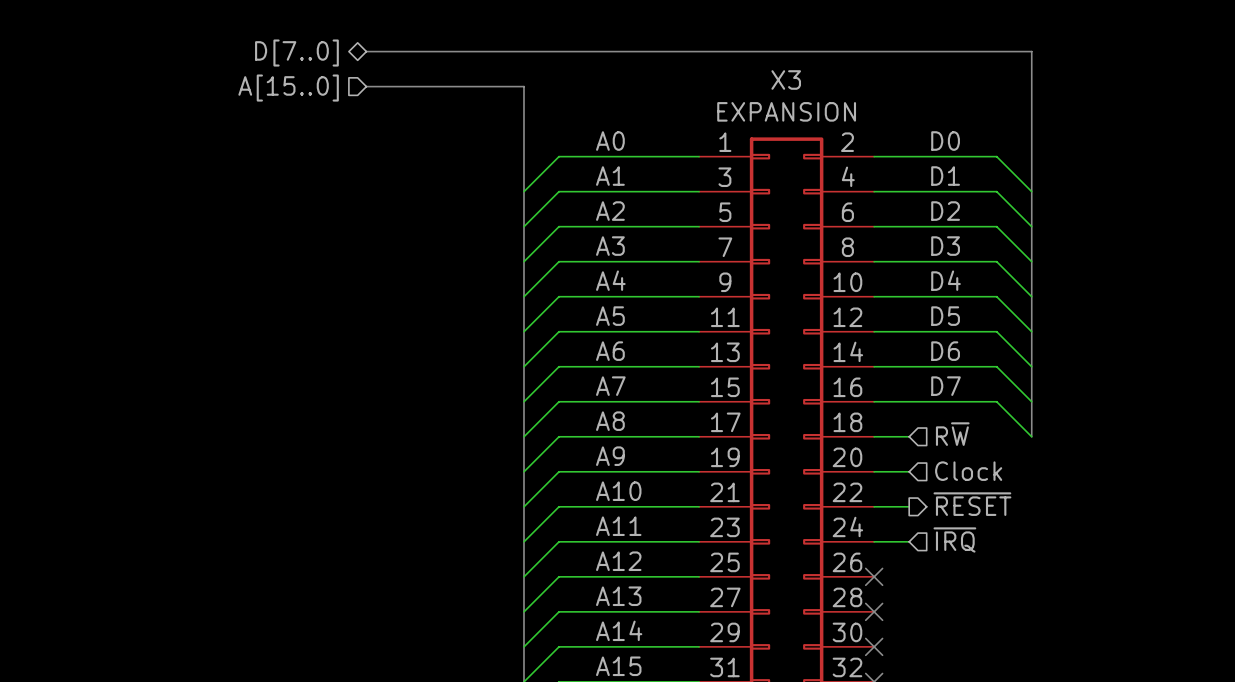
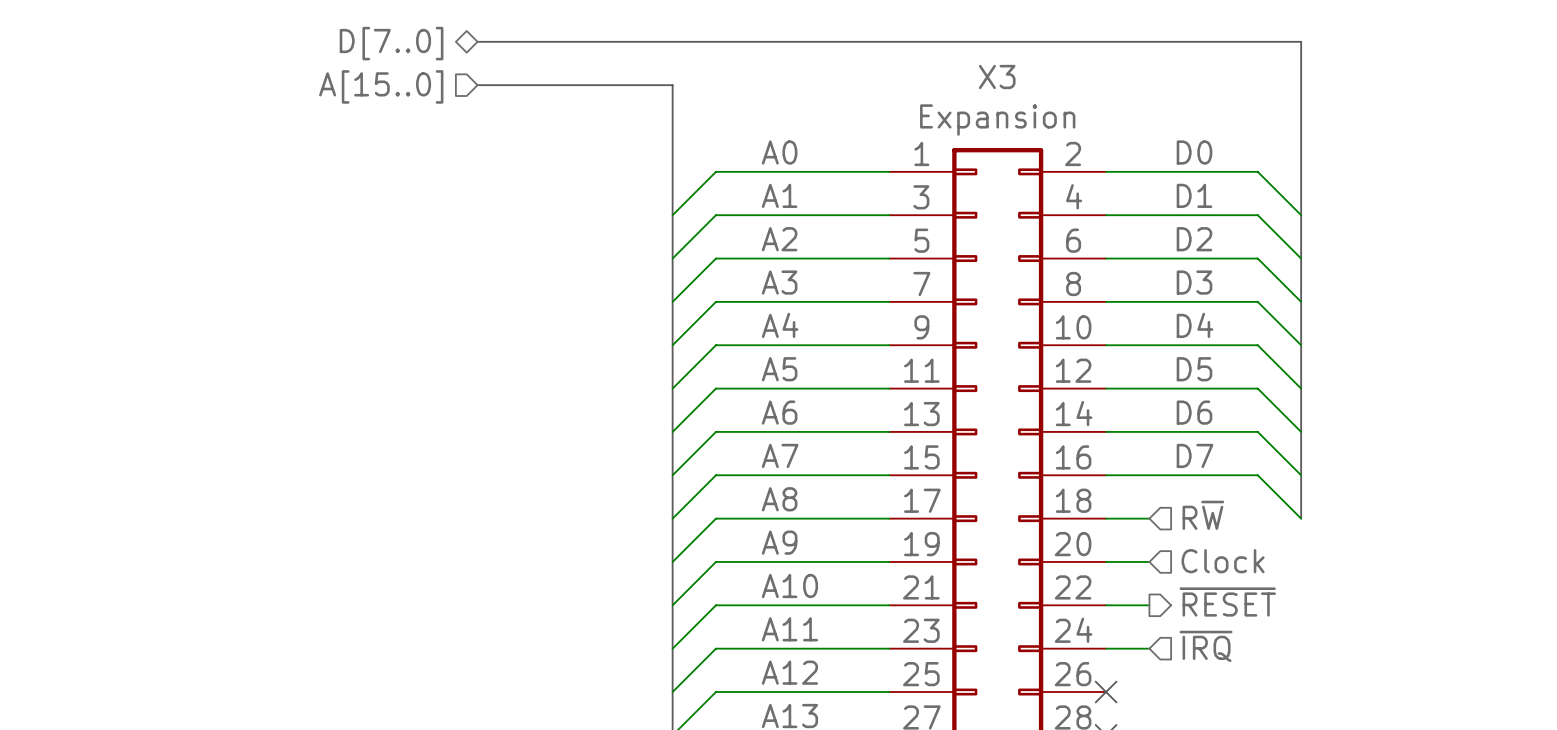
X3 value: EXPANSION (786, 111) -> Expansion (997, 120)

